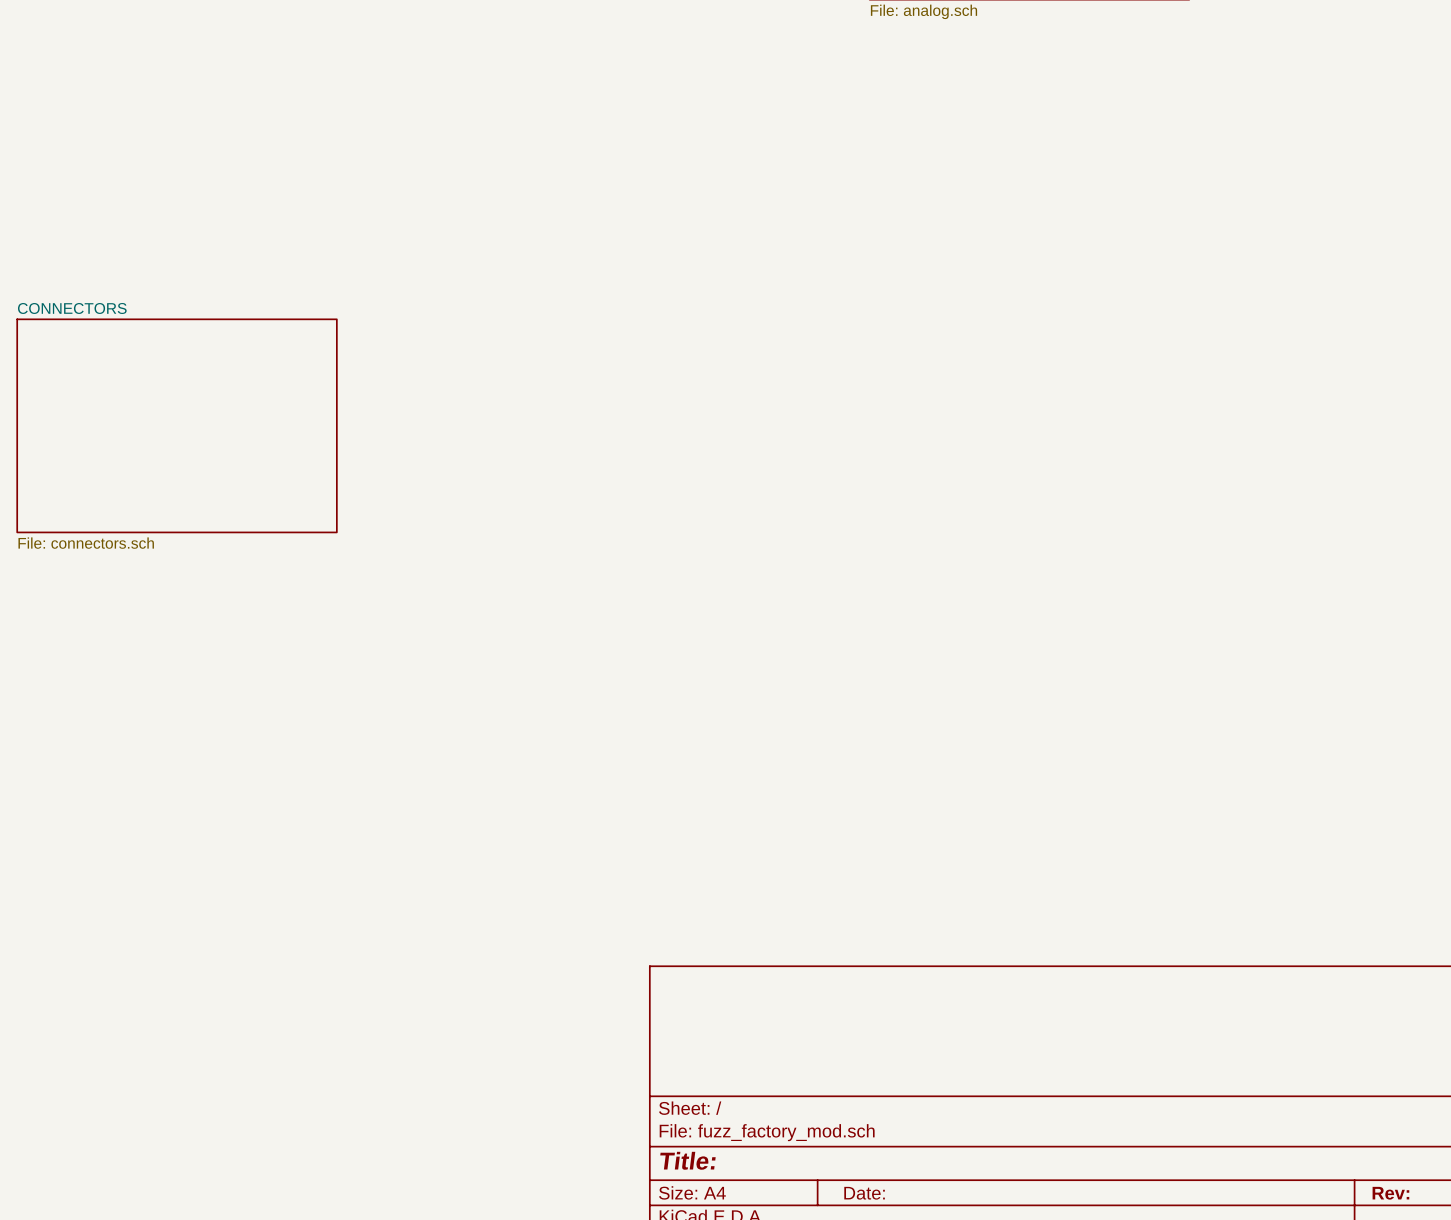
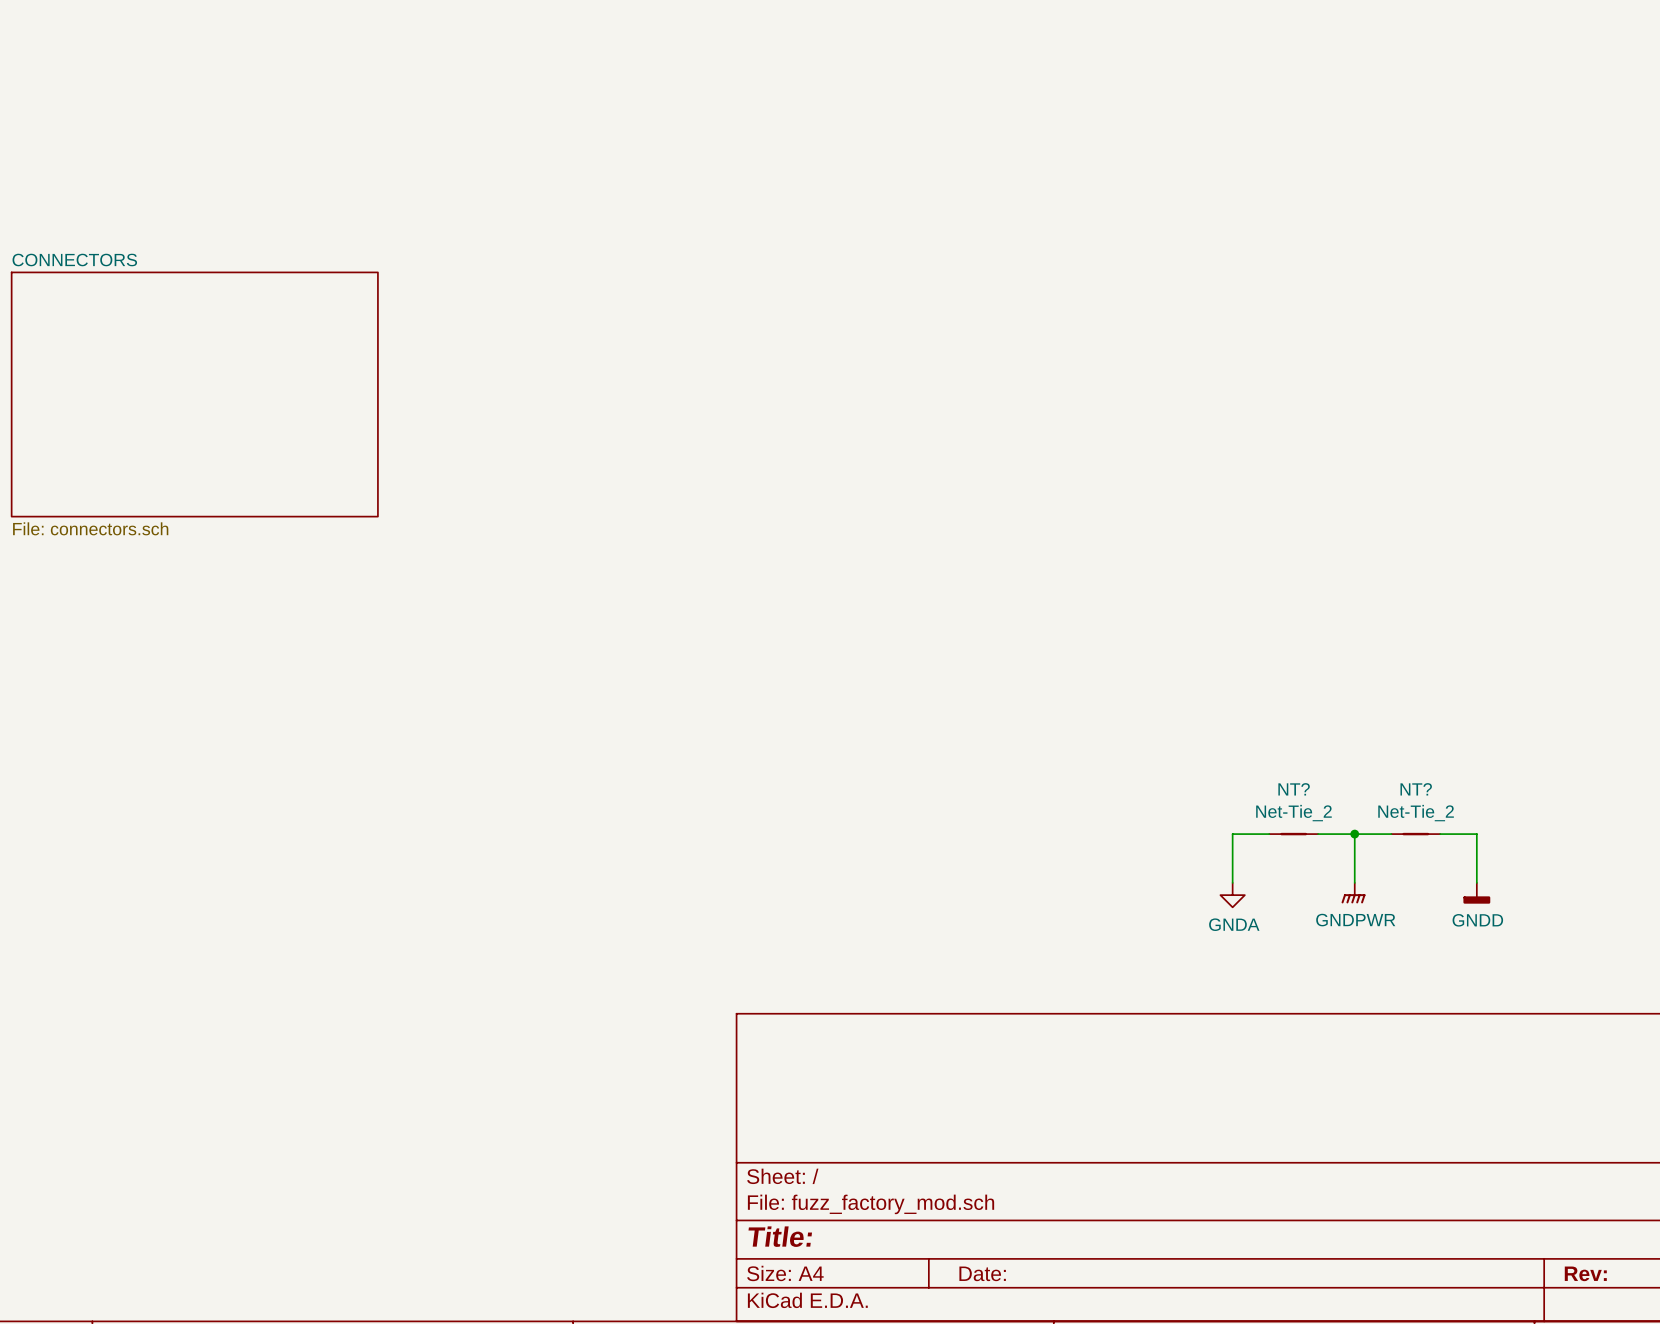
wire: none -> (1269, 834) (1232, 834) (1232, 882)
NT?: none -> Net-Tie_2 (1293, 834)
wire: none -> (1318, 834) (1391, 834)
wire: none -> (1354, 834) (1354, 882)
junction: none -> (1354, 834)
NT?: none -> Net-Tie_2 (1415, 834)
wire: none -> (1440, 834) (1476, 834) (1476, 882)
power symbol: none -> GNDPWR (1353, 893)
power symbol: none -> GNDD (1476, 893)
power symbol: none -> GNDA (1232, 895)

